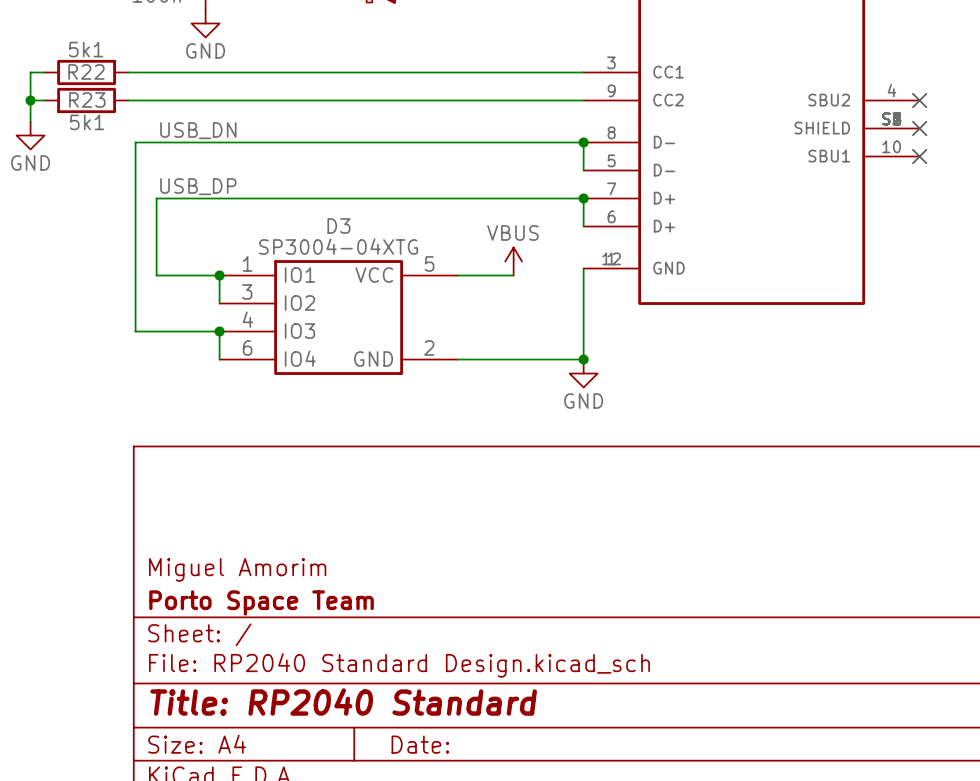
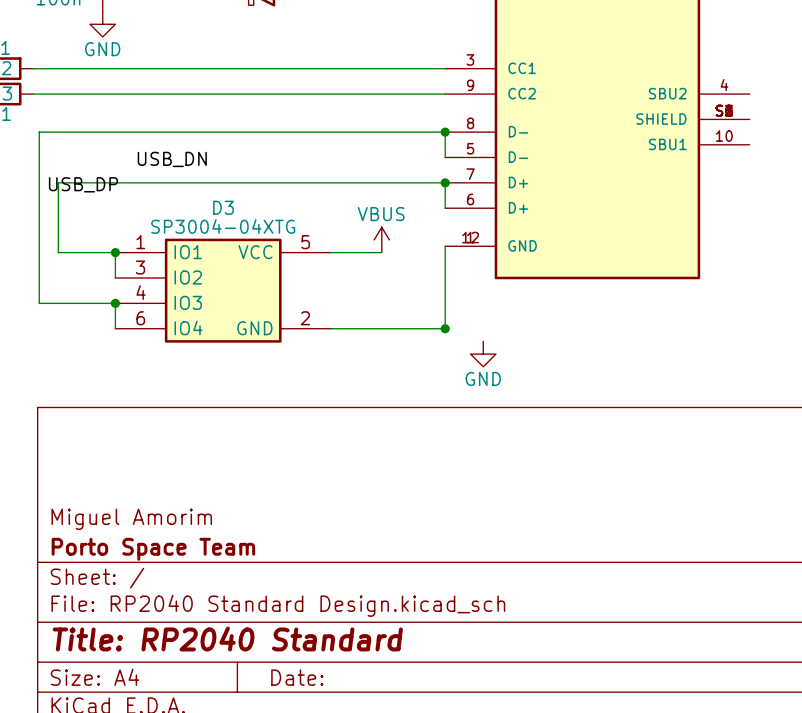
no-connect mark: (919, 100) -> none
no-connect mark: (919, 128) -> none
label position: USB_DN (198, 130) -> USB_DN (172, 159)
no-connect mark: (919, 156) -> none
label position: USB_DP (198, 186) -> USB_DP (83, 184)
power symbol position: GND (583, 373) -> GND (483, 354)

